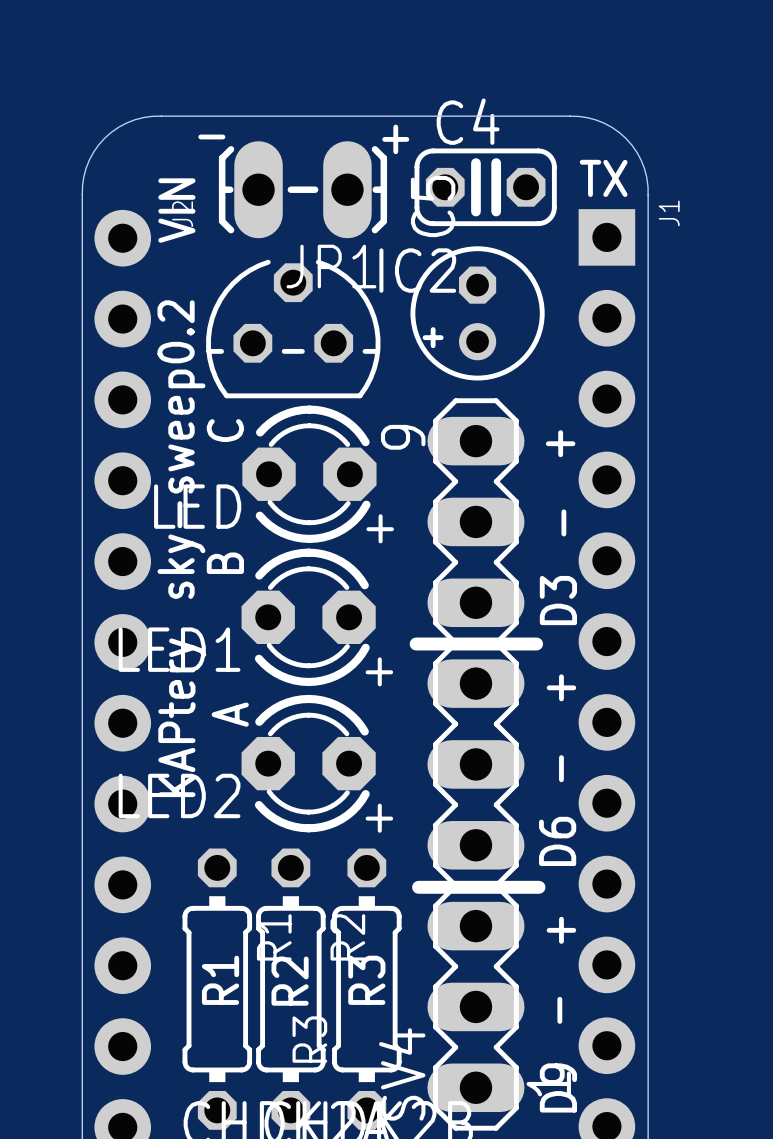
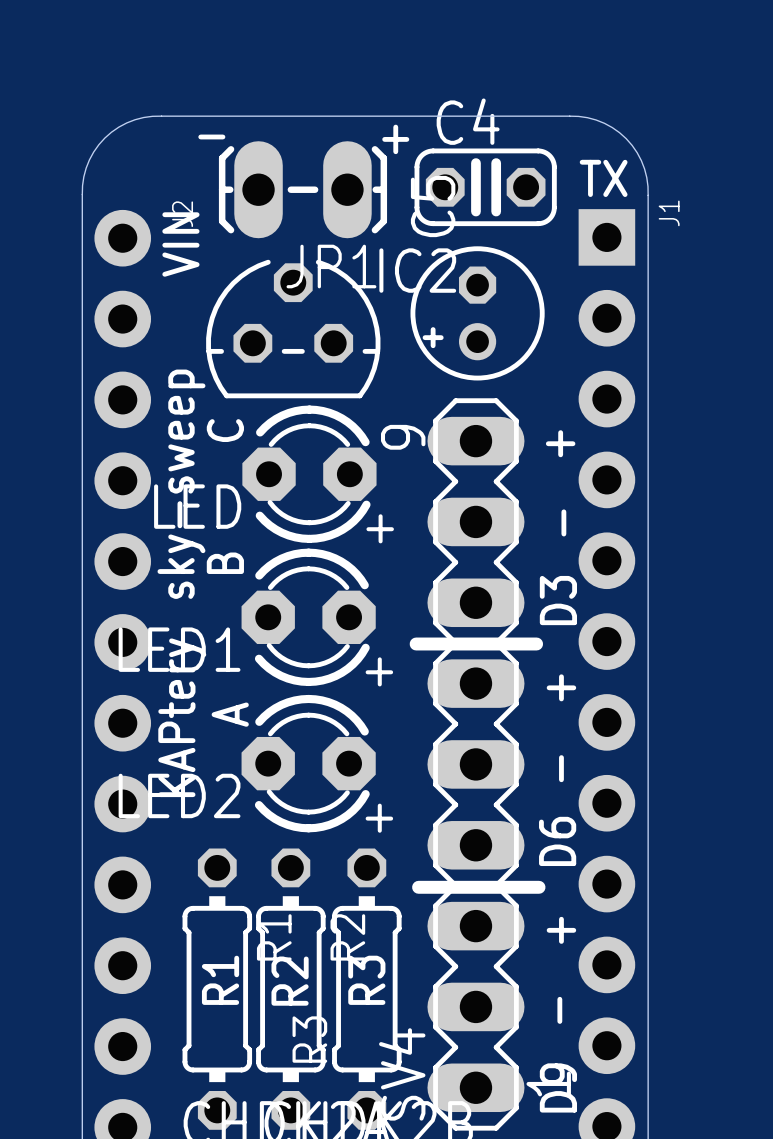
text position: VIN (176, 210) -> VIN (180, 244)
text: sky-sweep0.2 (181, 449) -> sky-sweep (181, 484)

